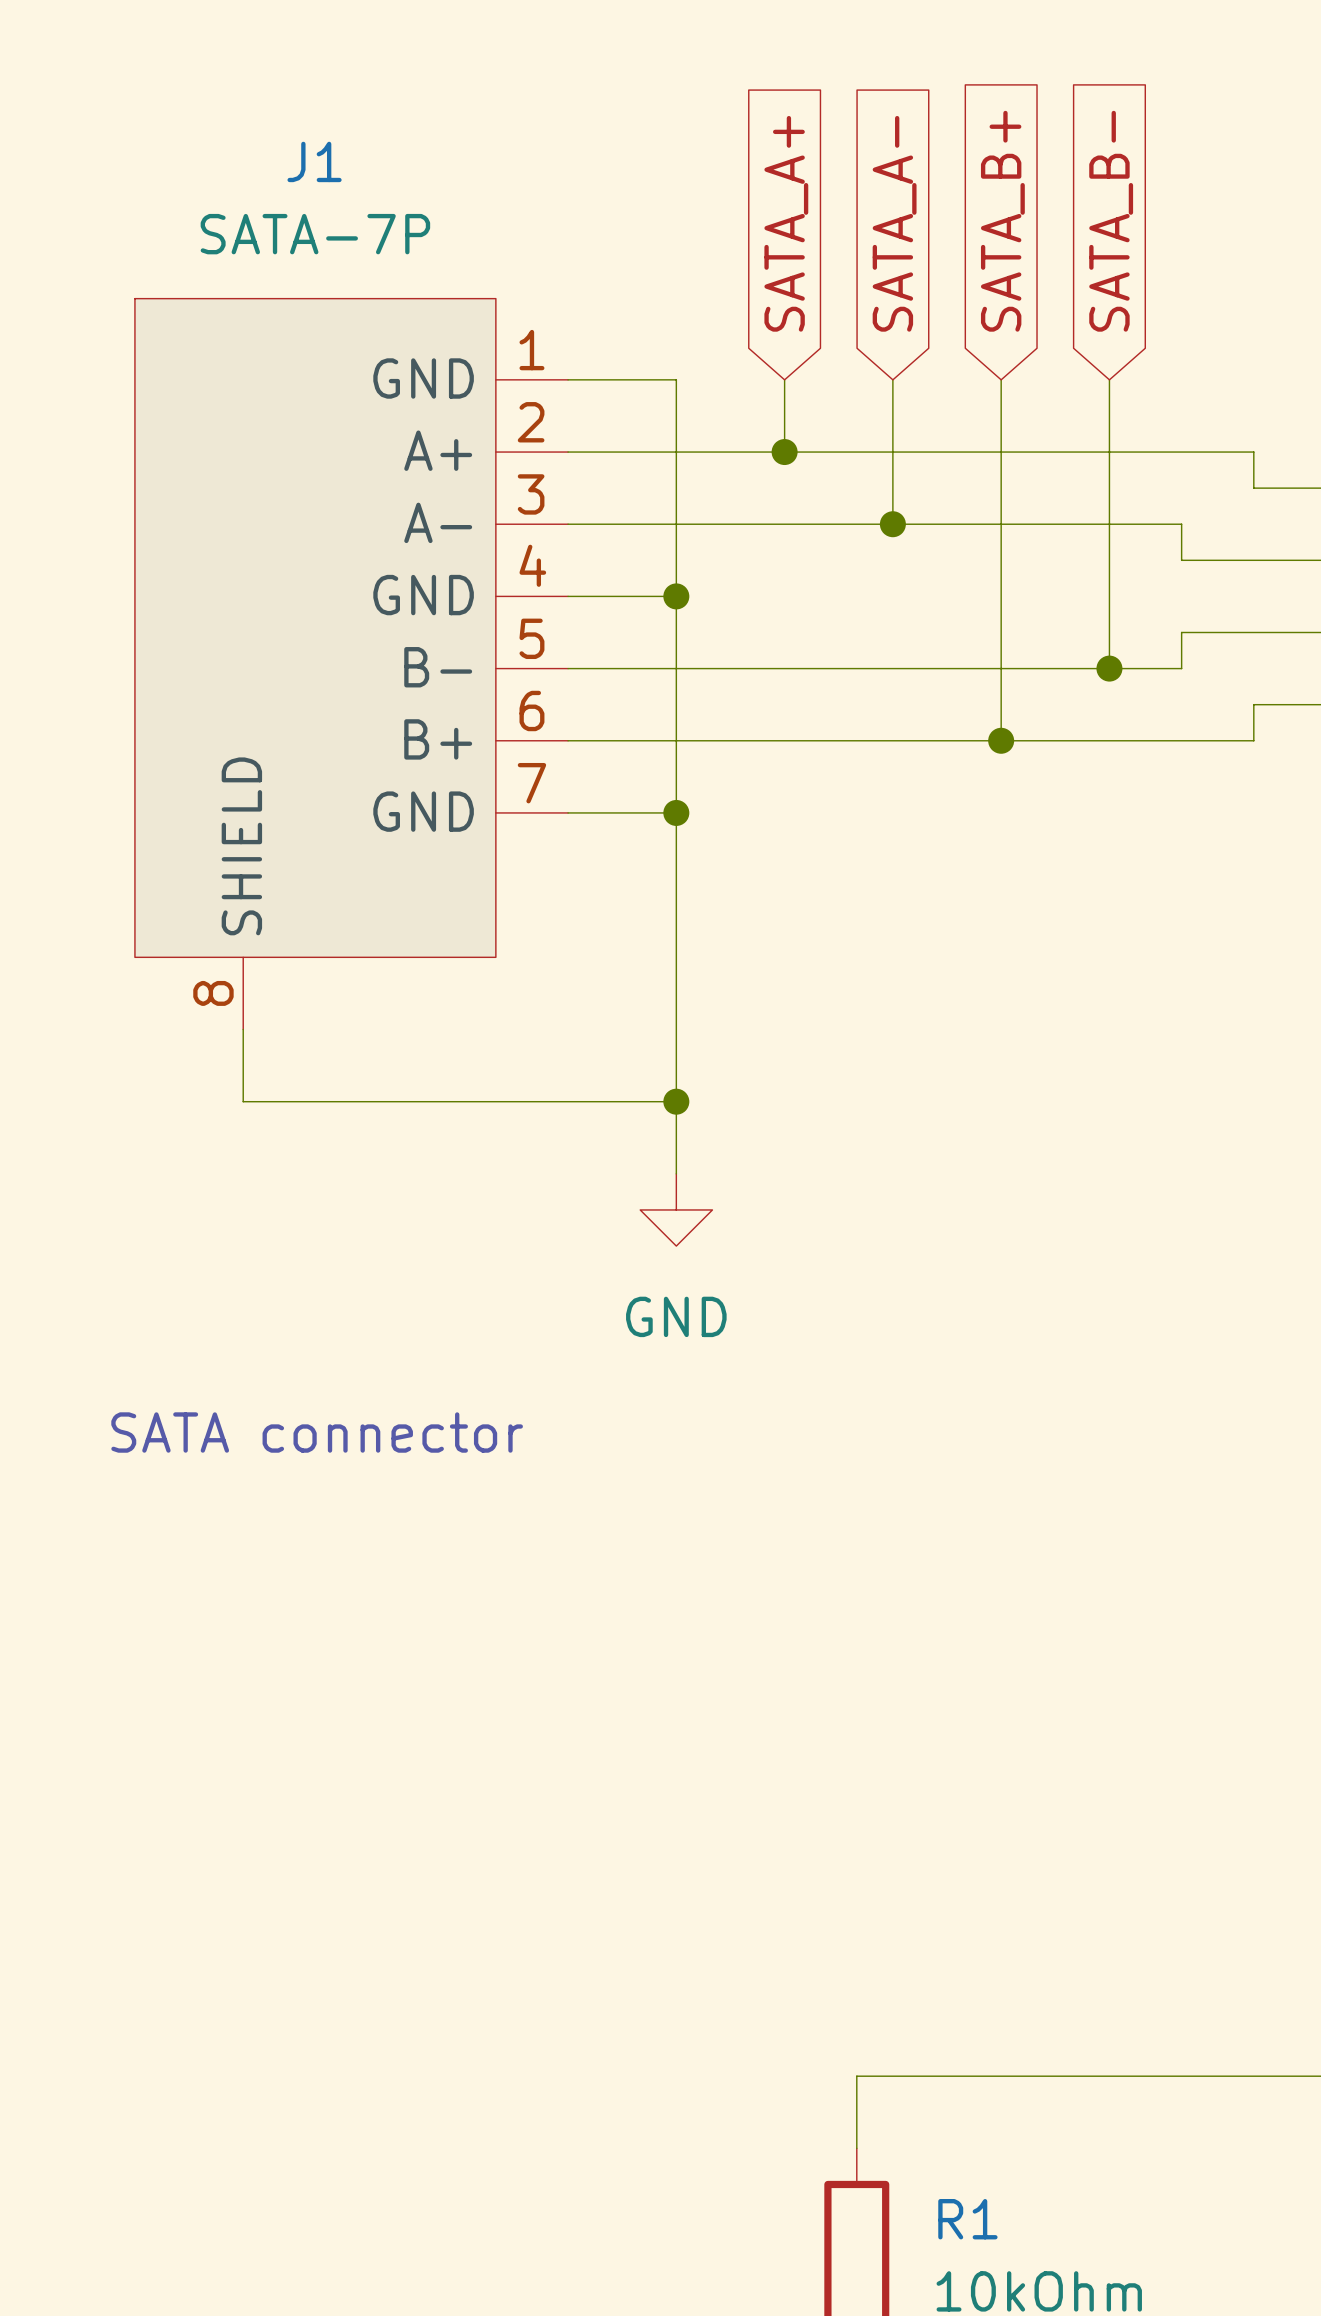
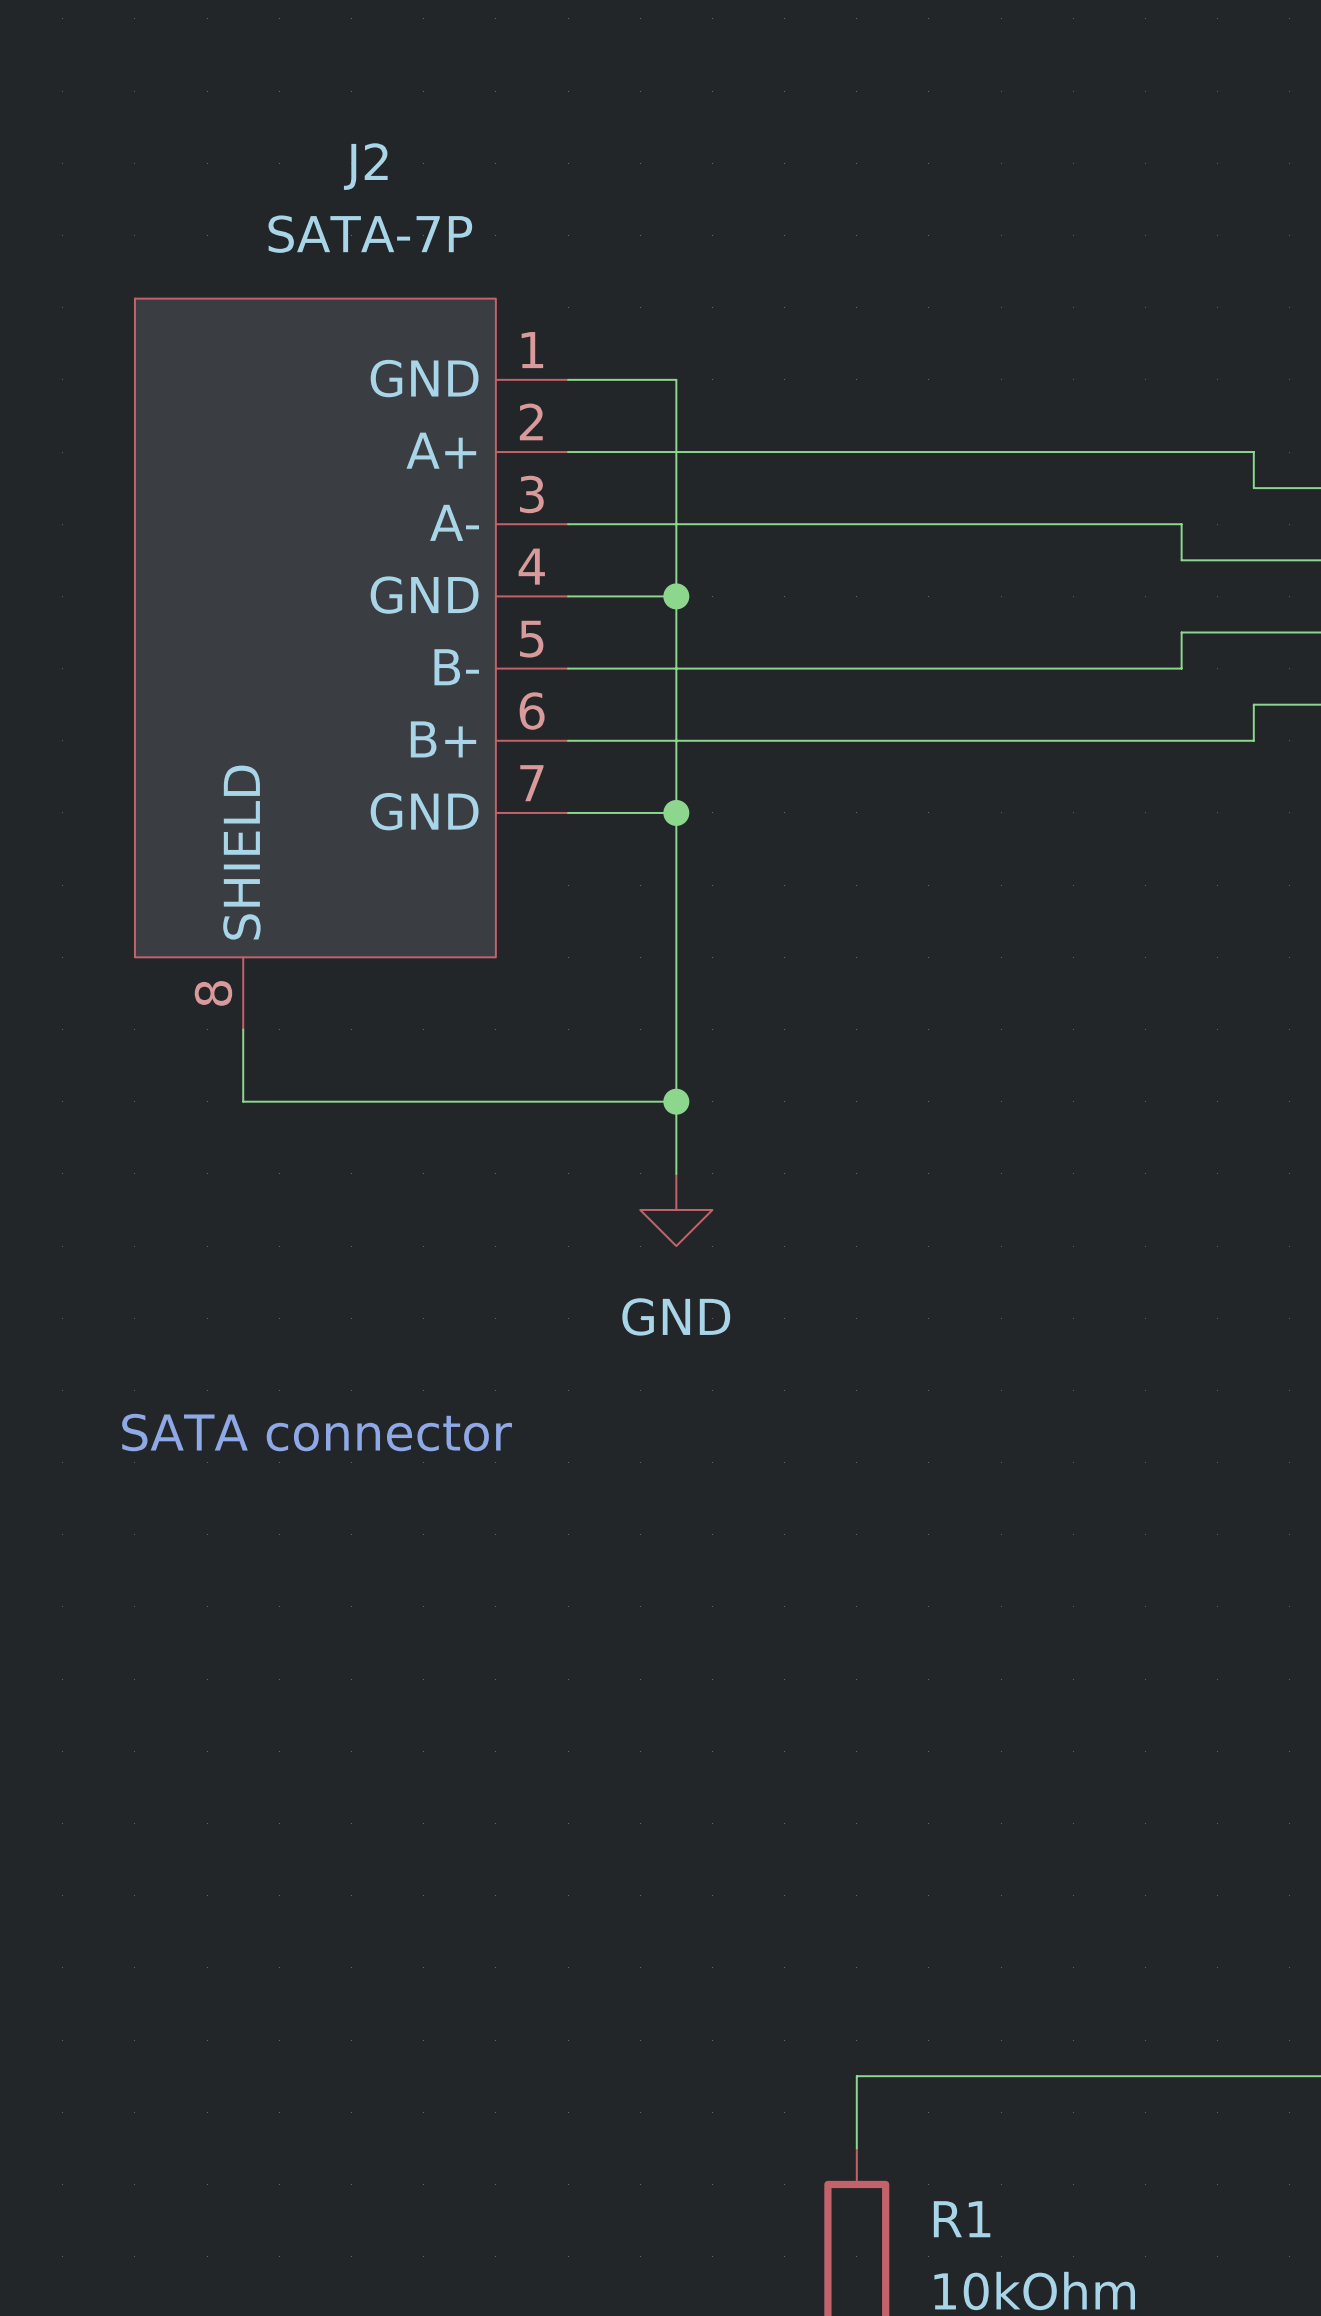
J1 name: J1 (314, 161) -> J2 (365, 166)
global label: SATA_B+ (1002, 221) -> none
global label: SATA_B- (1111, 221) -> none
global label: SATA_A+ (786, 223) -> none
global label: SATA_A- (894, 223) -> none
J1 value position: SATA-7P (315, 234) -> SATA-7P (370, 234)
wire: (784, 379) (784, 452) -> none
wire: (892, 379) (892, 524) -> none
wire: (1001, 379) (1001, 740) -> none
wire: (1109, 379) (1109, 668) -> none
junction: (784, 452) -> none
junction: (892, 524) -> none
junction: (1109, 668) -> none
junction: (1001, 740) -> none

